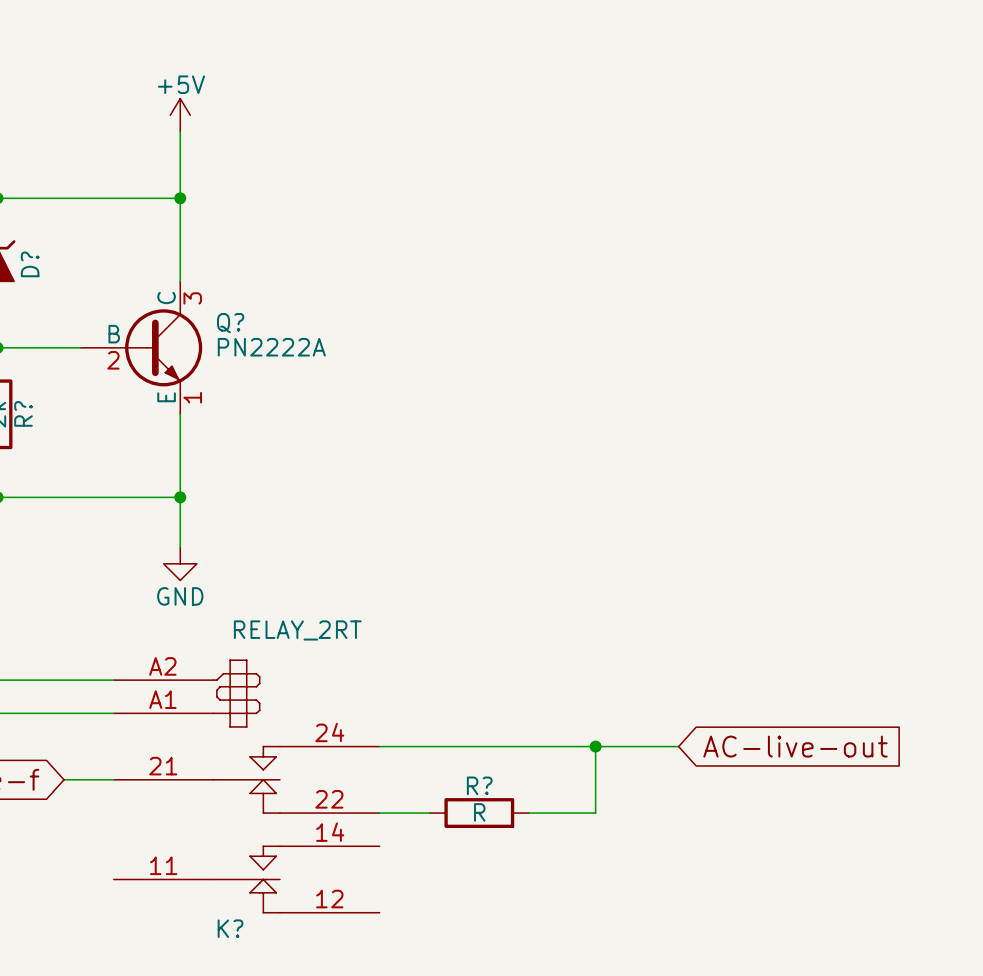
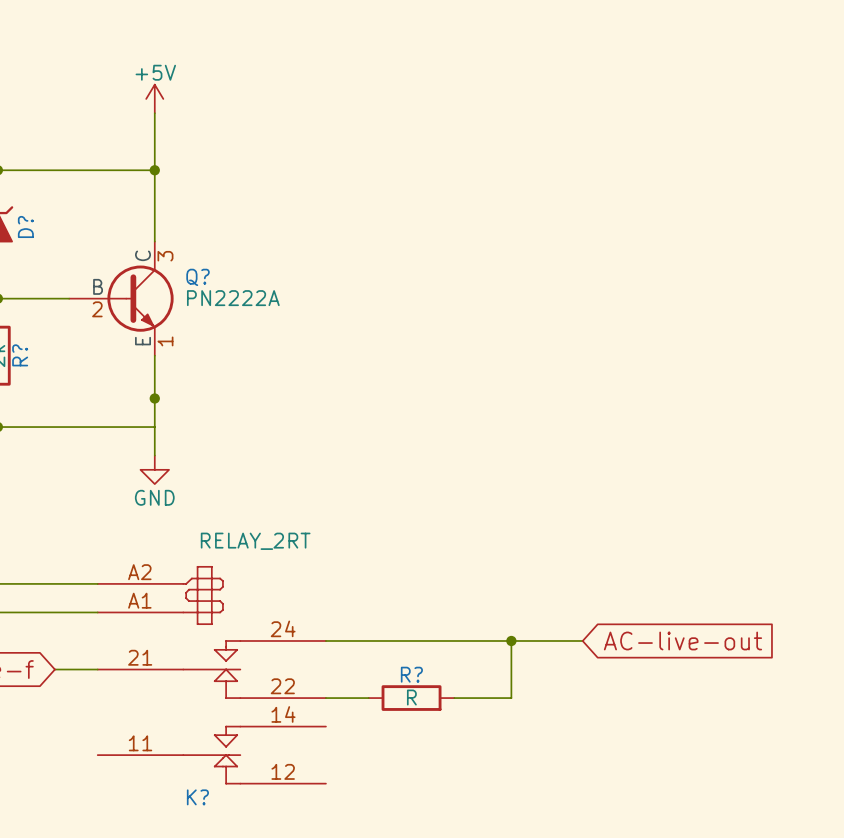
junction position: (180, 497) -> (154, 398)
power symbol position: GND (180, 563) -> GND (154, 469)

